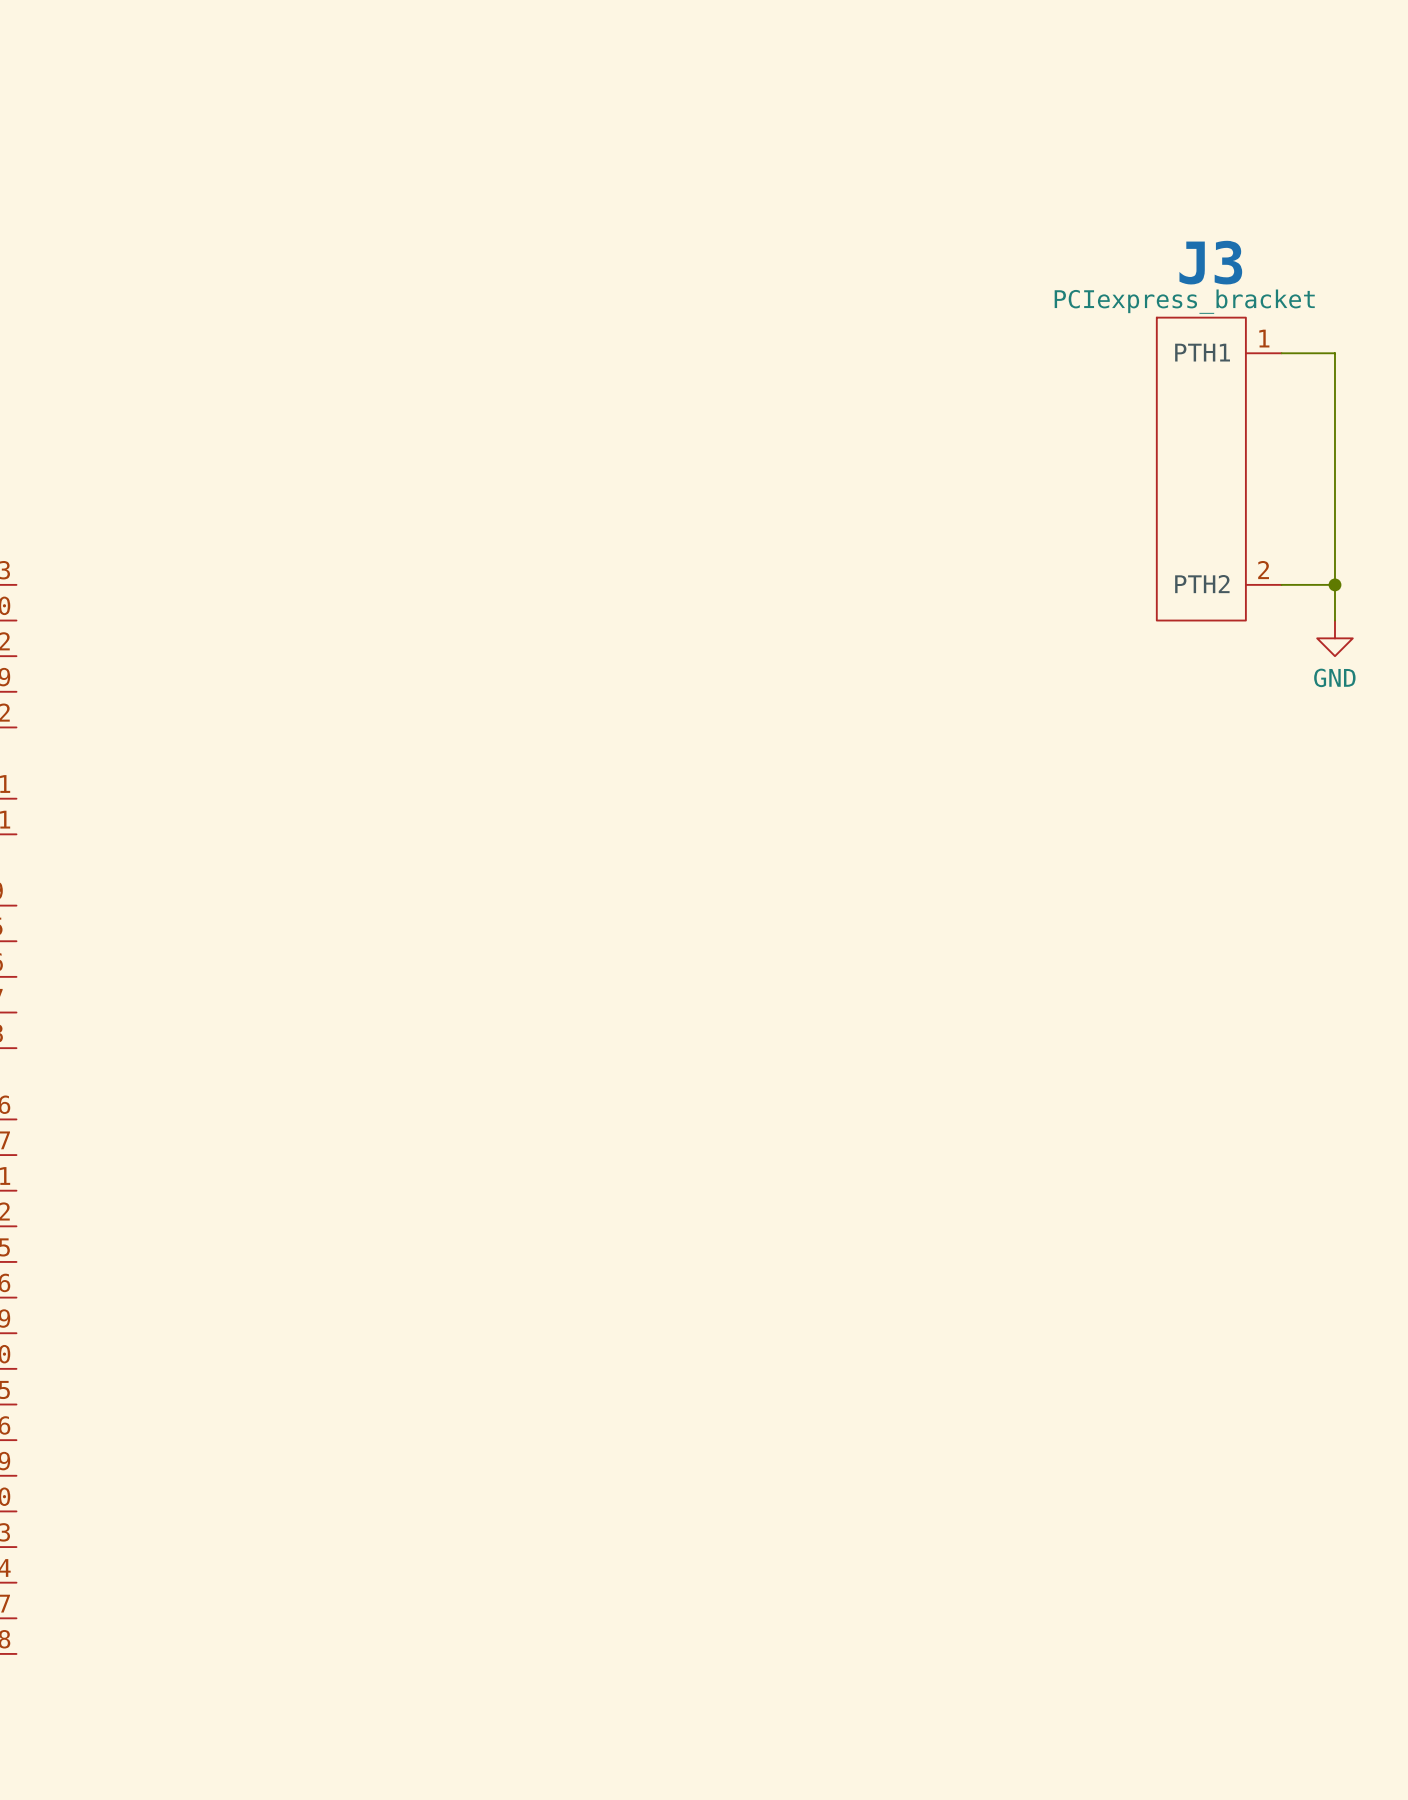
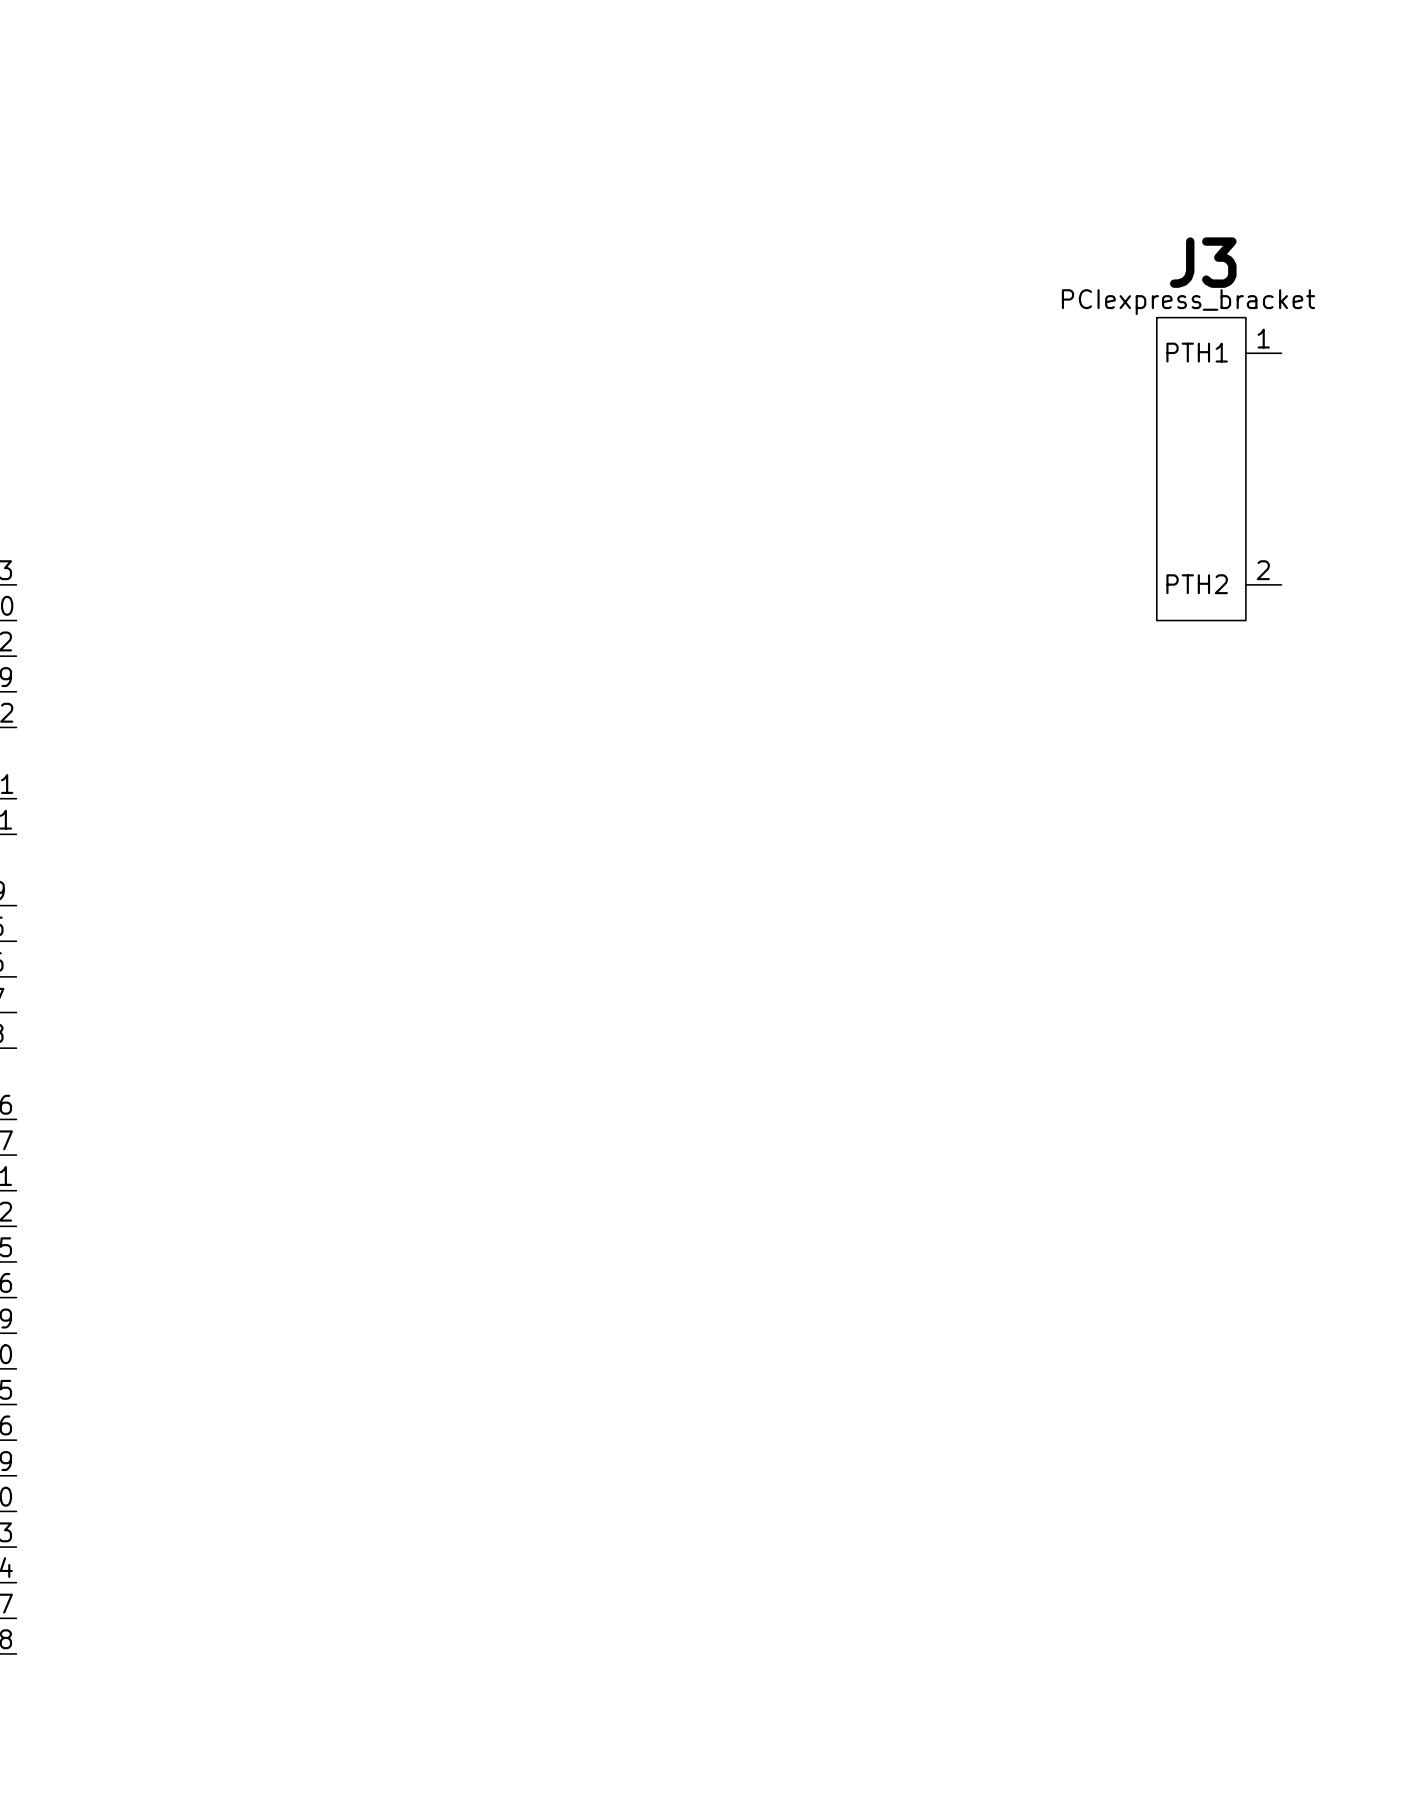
wire: (1281, 353) (1334, 353) (1334, 620) -> none
wire: (1281, 584) (1334, 584) -> none
junction: (1334, 584) -> none
power symbol: GND (1334, 638) -> none

